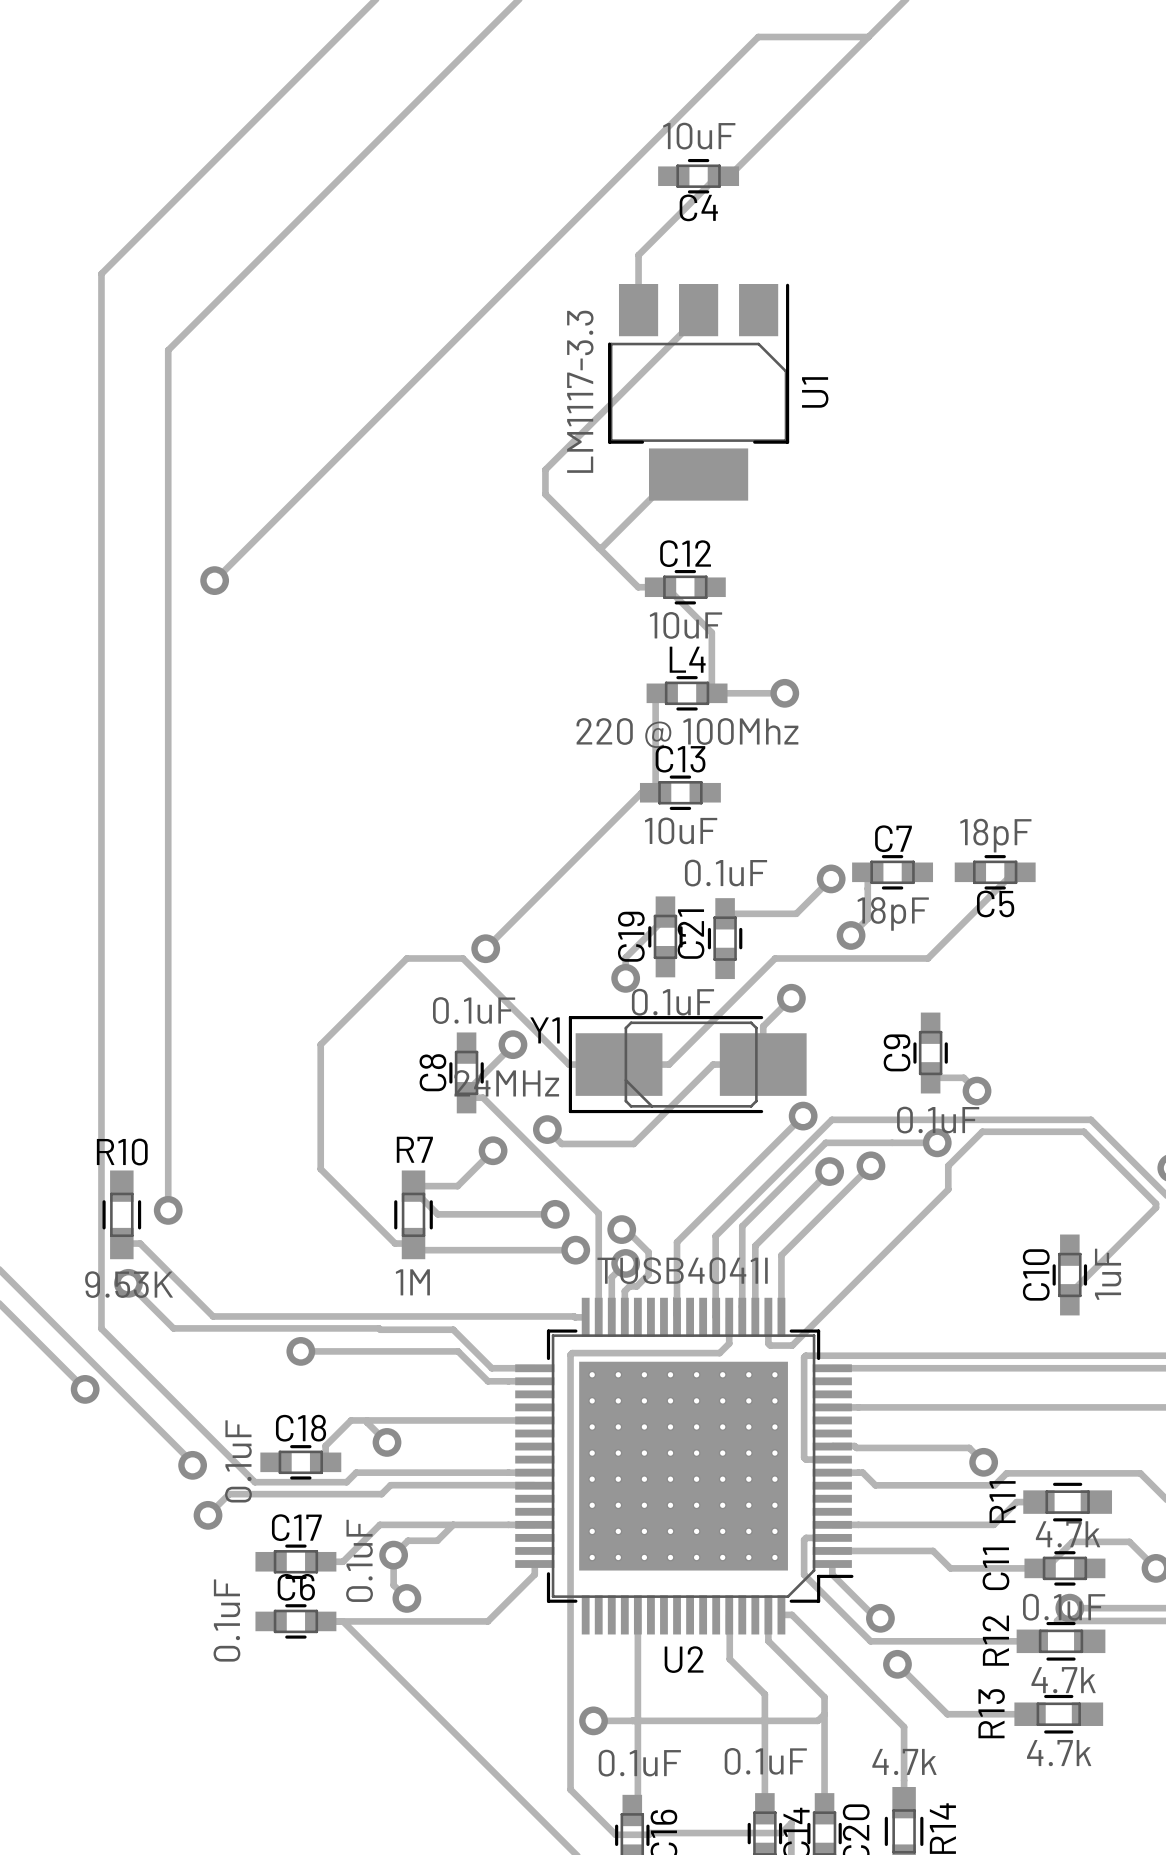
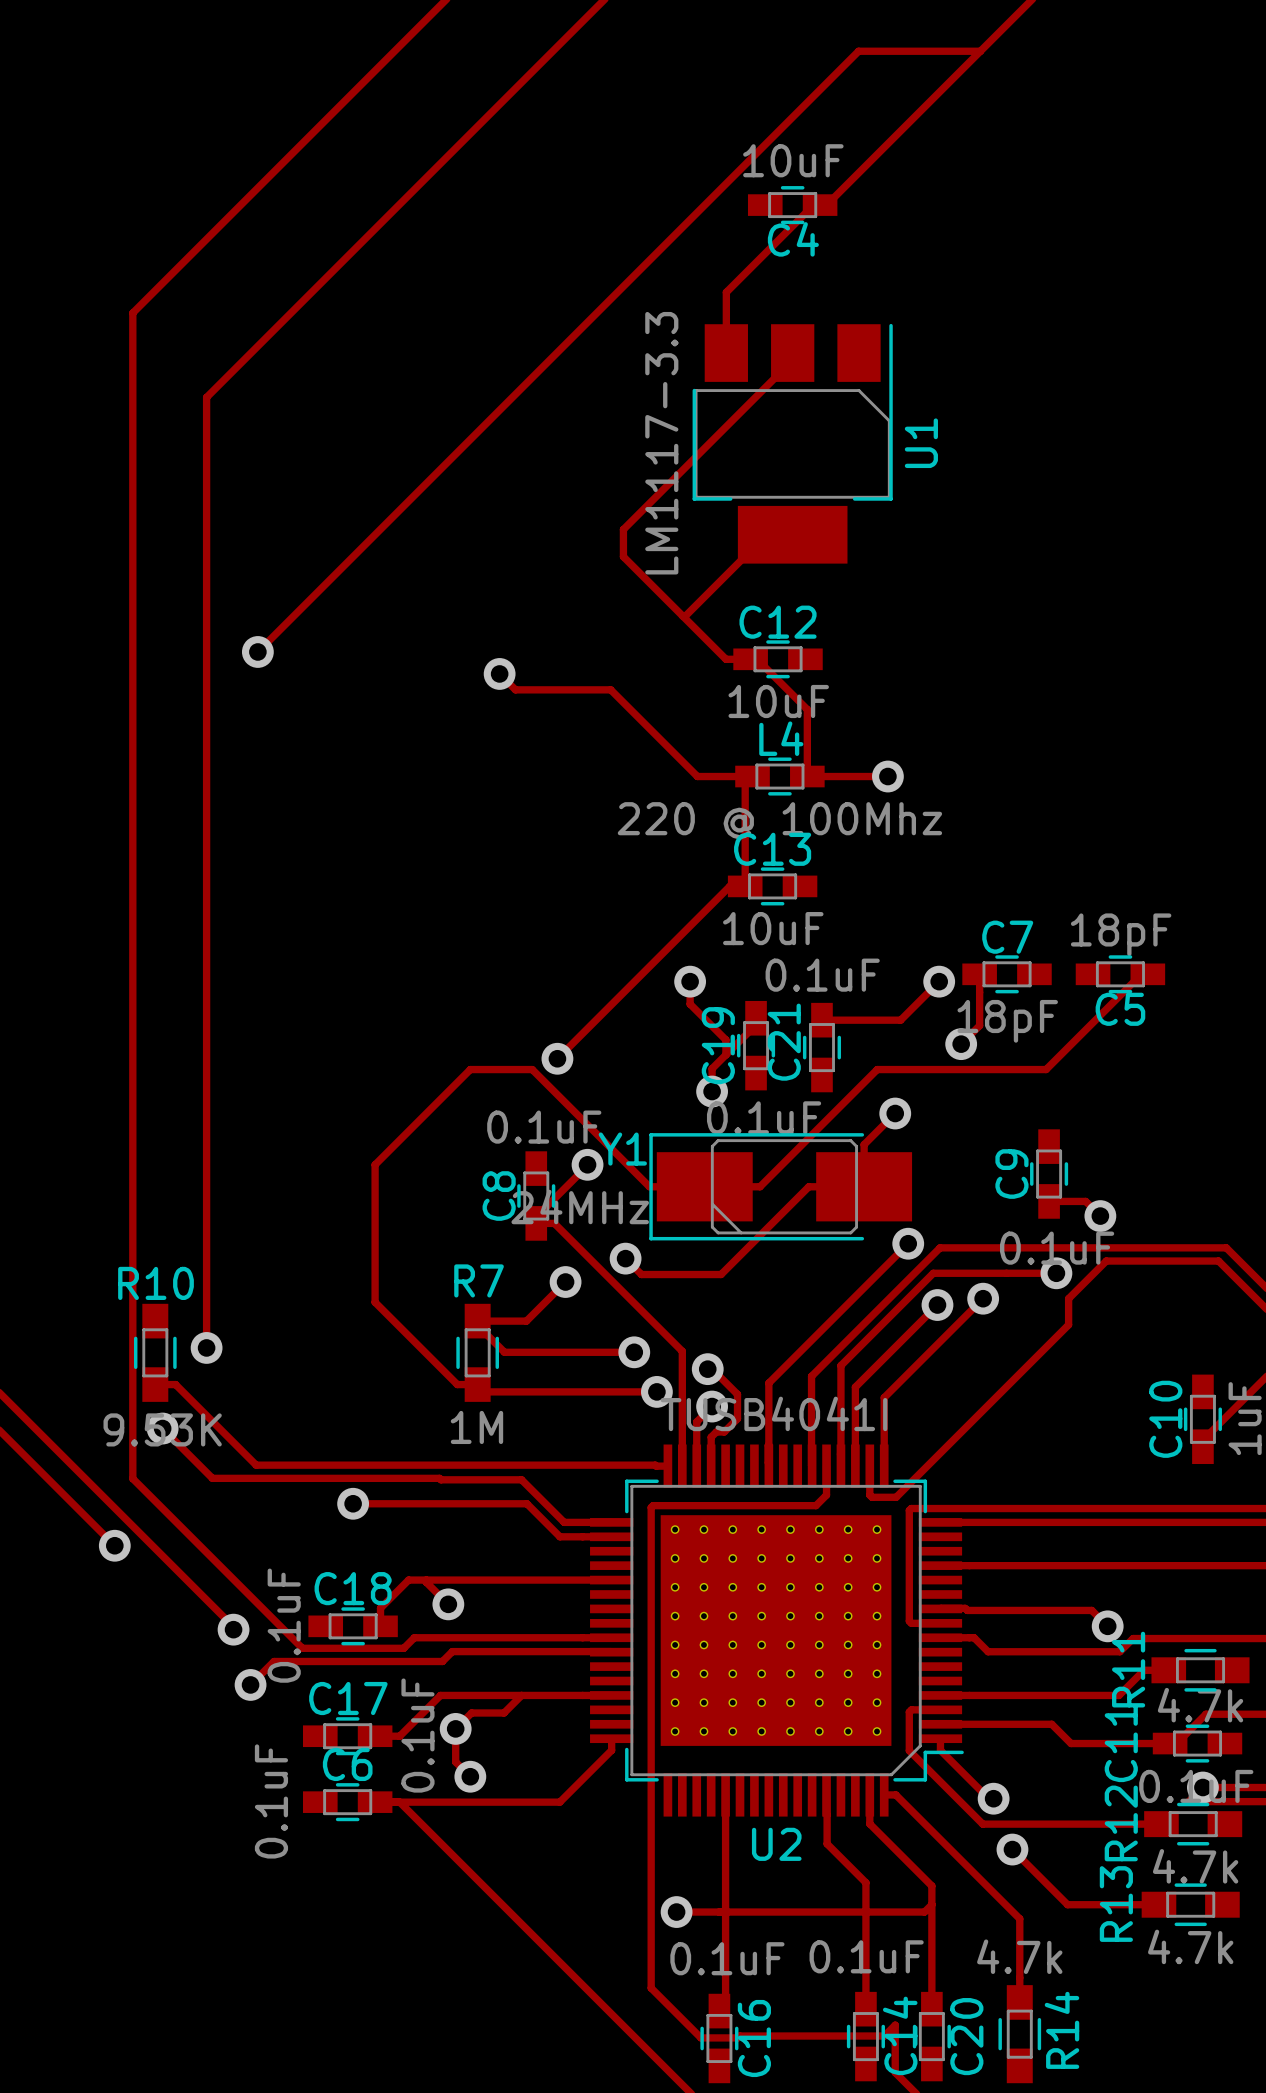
track: none -> (499, 673) (515, 689) (610, 689) (697, 776) (752, 776)
via: none -> (499, 673)
track: none -> (690, 981) (690, 1004) (725, 1039) (725, 1054)
via: none -> (690, 981)

